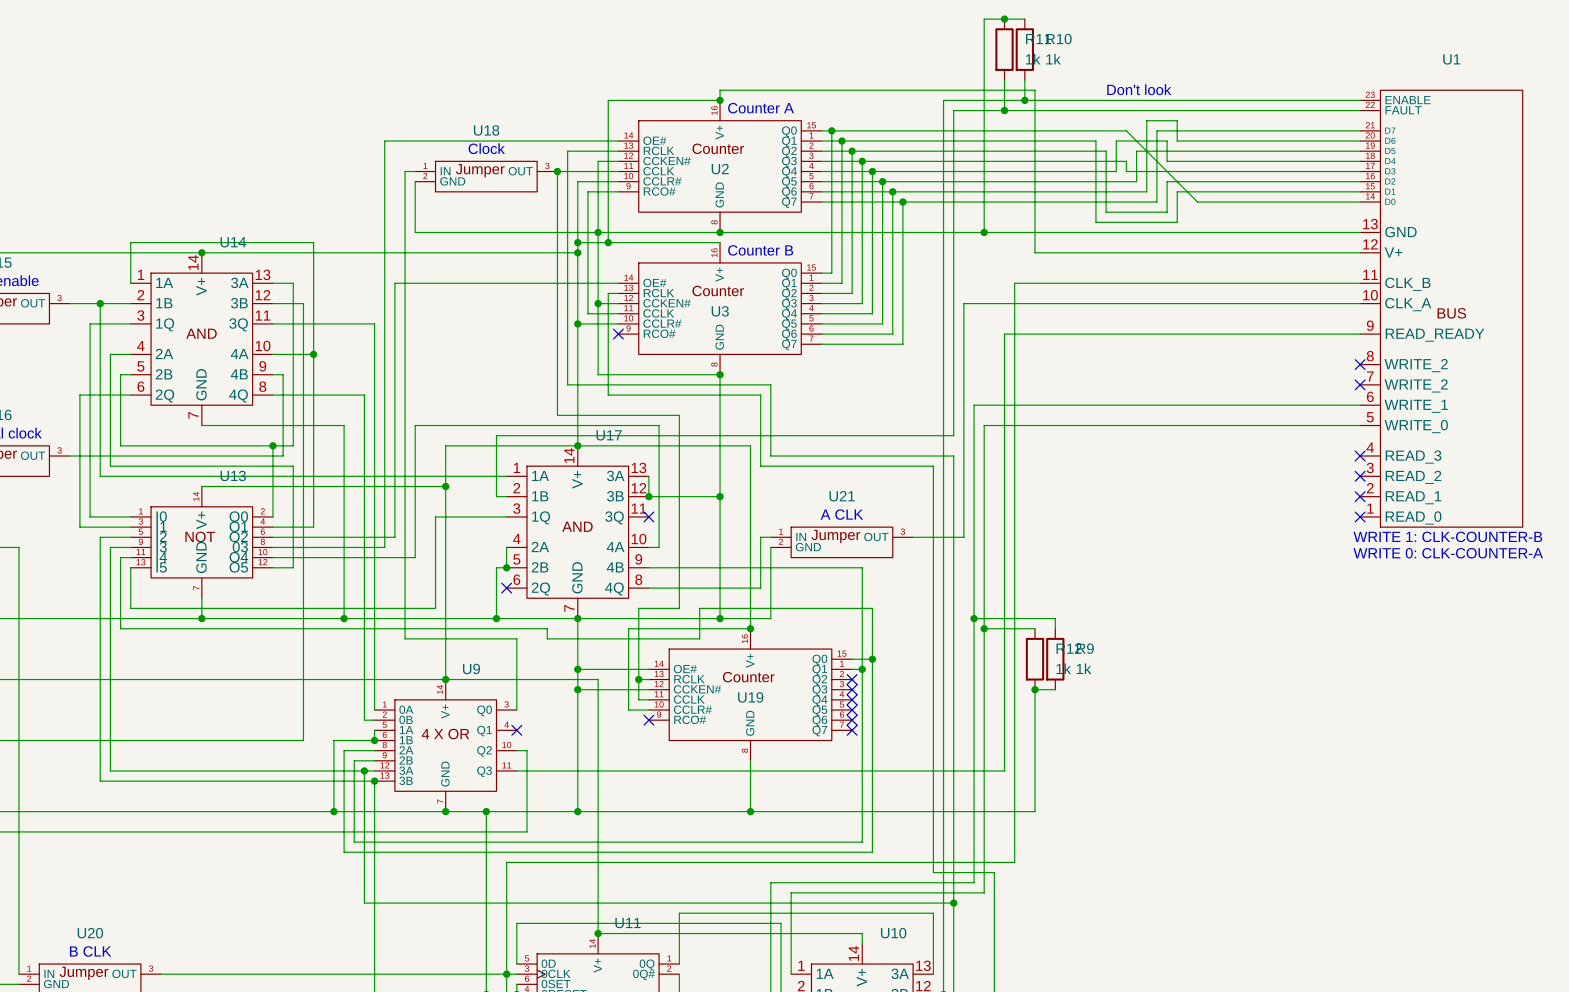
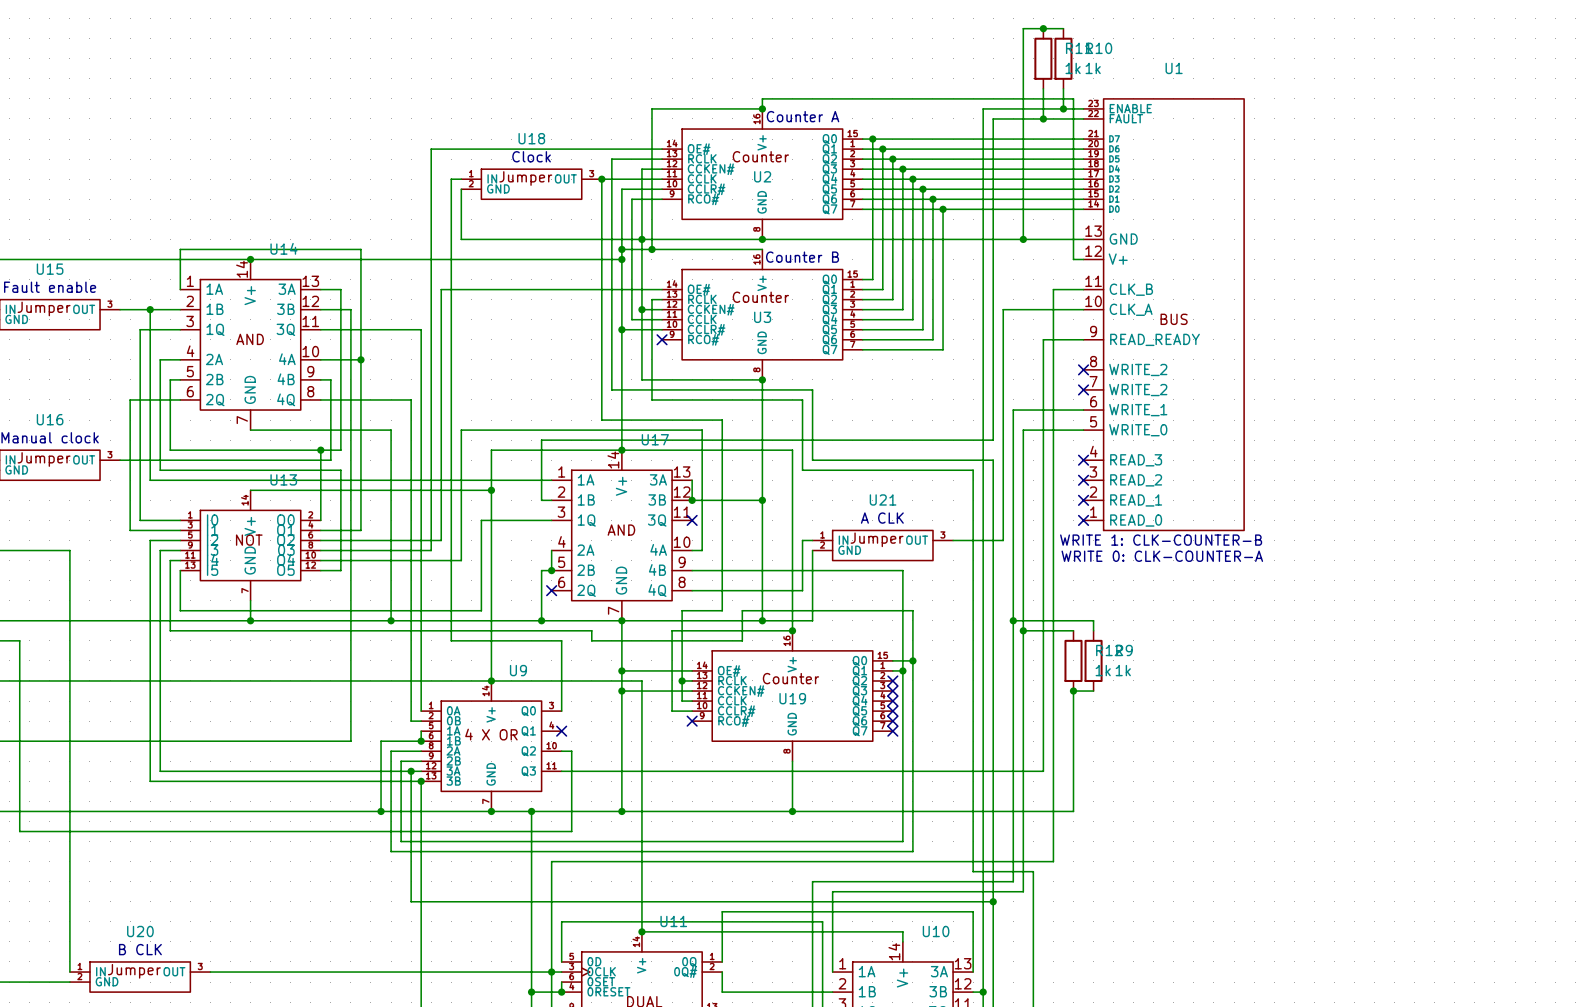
text: Don't look (1139, 89) -> none
wire: (1045, 100) (1360, 100) -> none
wire: (1045, 110) (1360, 110) -> none
wire: (1045, 130) (1126, 130) (1197, 202) (1360, 202) -> none
wire: (1360, 130) (1156, 130) (1156, 202) (1045, 202) -> none
wire: (1045, 141) (1095, 141) (1095, 222) (1177, 222) (1177, 191) (1360, 191) -> none
wire: (1360, 141) (1177, 141) (1177, 120) (1146, 120) (1146, 191) (1045, 191) -> none
wire: (1045, 151) (1106, 151) (1106, 212) (1167, 212) (1167, 181) (1360, 181) -> none
wire: (1360, 151) (1136, 151) (1136, 181) (1045, 181) -> none
wire: (1045, 161) (1126, 161) (1126, 171) (1360, 171) -> none
wire: (1360, 161) (1167, 161) (1167, 141) (1116, 141) (1116, 171) (1045, 171) -> none
wire: (1045, 232) (1360, 232) -> none
wire: (1045, 252) (1360, 252) -> none
wire: (1045, 283) (1360, 283) -> none
wire: (1045, 303) (1360, 303) -> none
U1 position: (1441, 308) -> (1163, 314)
wire: (1045, 334) (1360, 334) -> none
no-connect mark: none -> (1083, 369)
no-connect mark: (1360, 364) -> none
no-connect mark: none -> (1083, 389)
no-connect mark: (1360, 384) -> none
wire: (1045, 405) (1360, 405) -> none
wire: (1045, 425) (1360, 425) -> none
no-connect mark: none -> (1083, 460)
no-connect mark: (1360, 456) -> none
no-connect mark: none -> (1083, 480)
no-connect mark: (1360, 476) -> none
no-connect mark: none -> (1083, 500)
no-connect mark: (1360, 496) -> none
no-connect mark: none -> (1083, 520)
no-connect mark: (1360, 516) -> none
text: none -> WRITE 1: CLK-COUNTER-B (1161, 540)
text: WRITE 1: CLK-COUNTER-B (1447, 536) -> none
text: none -> WRITE 0: CLK-COUNTER-A (1162, 556)
text: WRITE 0: CLK-COUNTER-A (1448, 553) -> none

